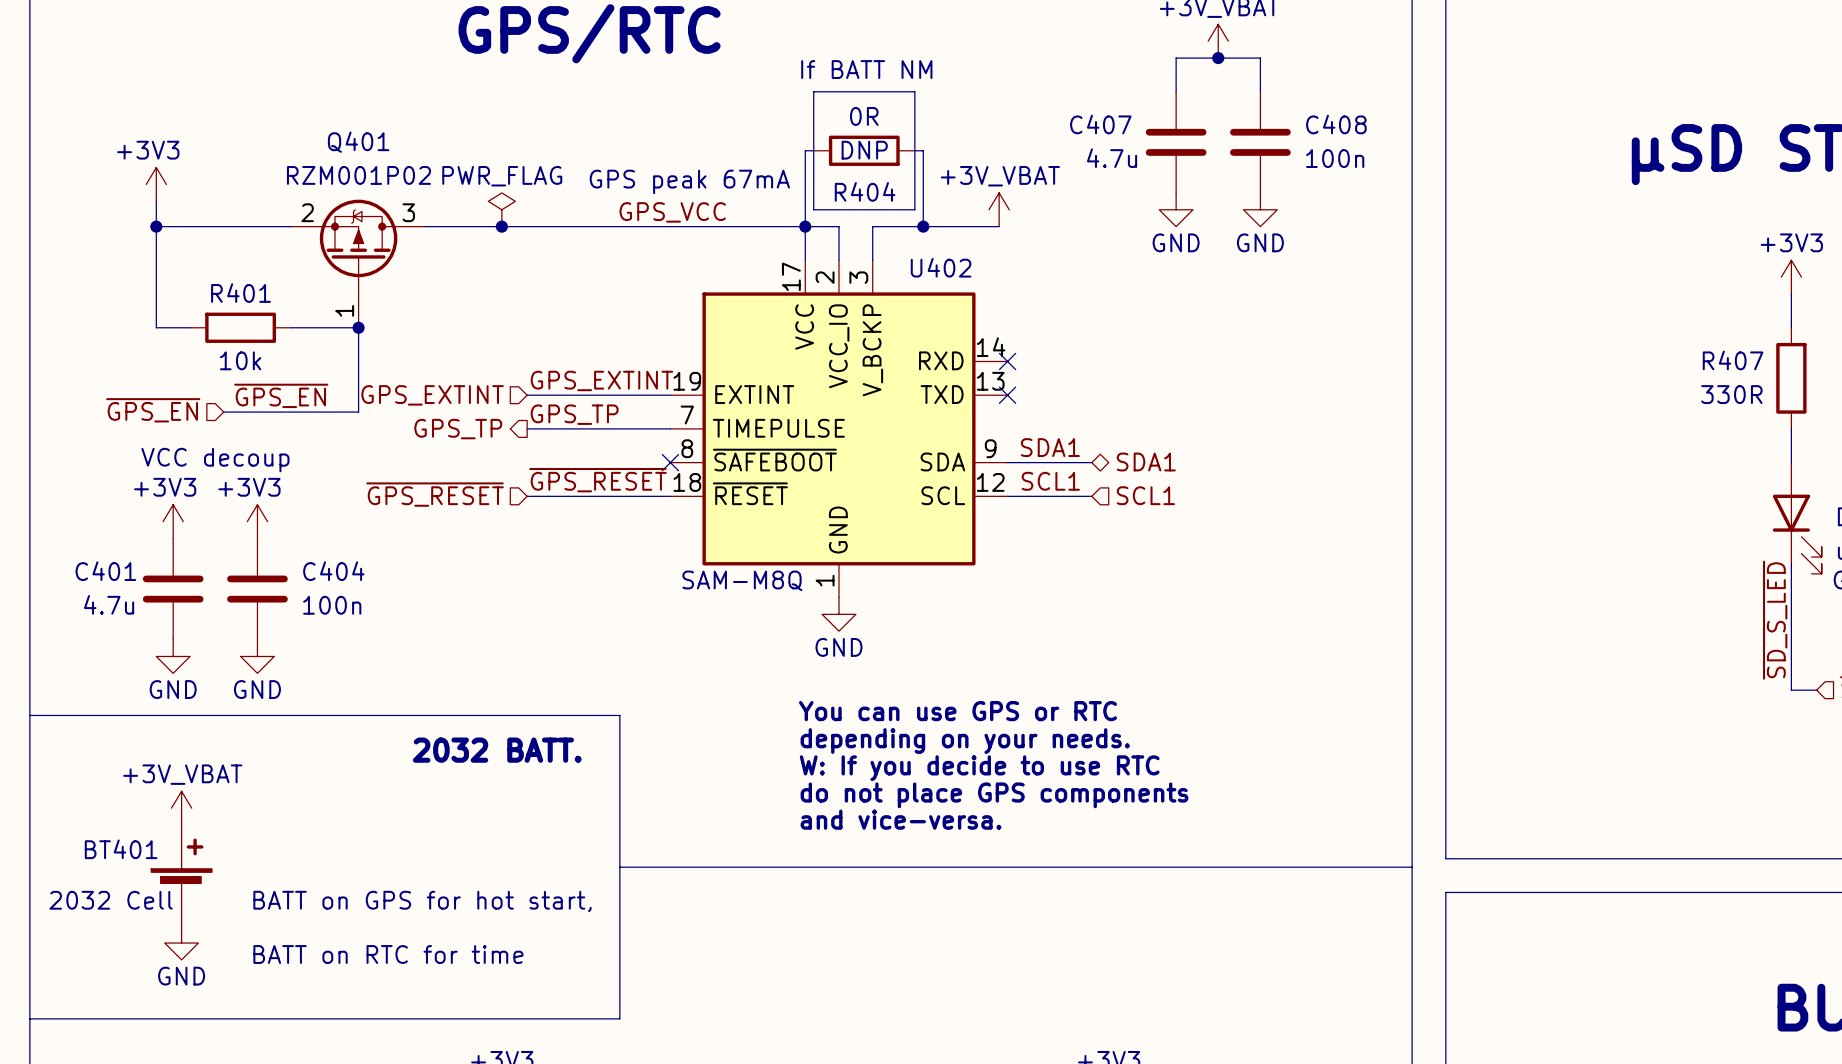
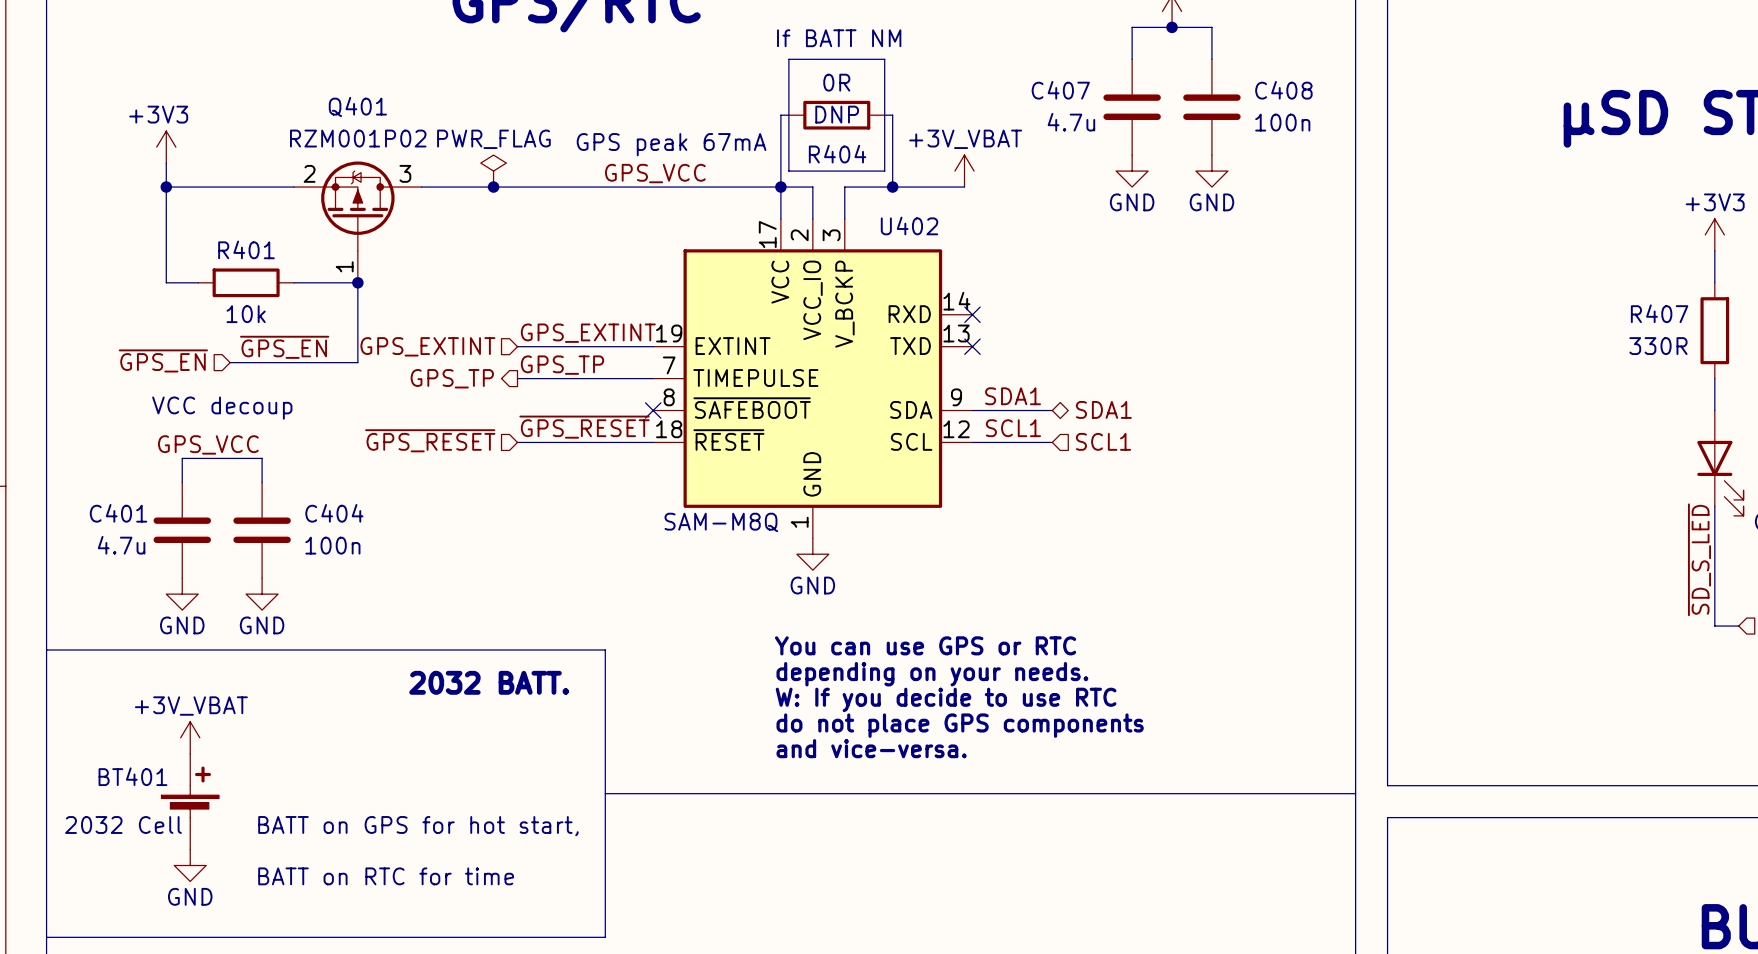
label: none -> GPS_VCC (208, 444)
power symbol: +3V3 (173, 521) -> none
power symbol: +3V3 (257, 521) -> none
wire: none -> (182, 482) (182, 458) (262, 458) (262, 482)

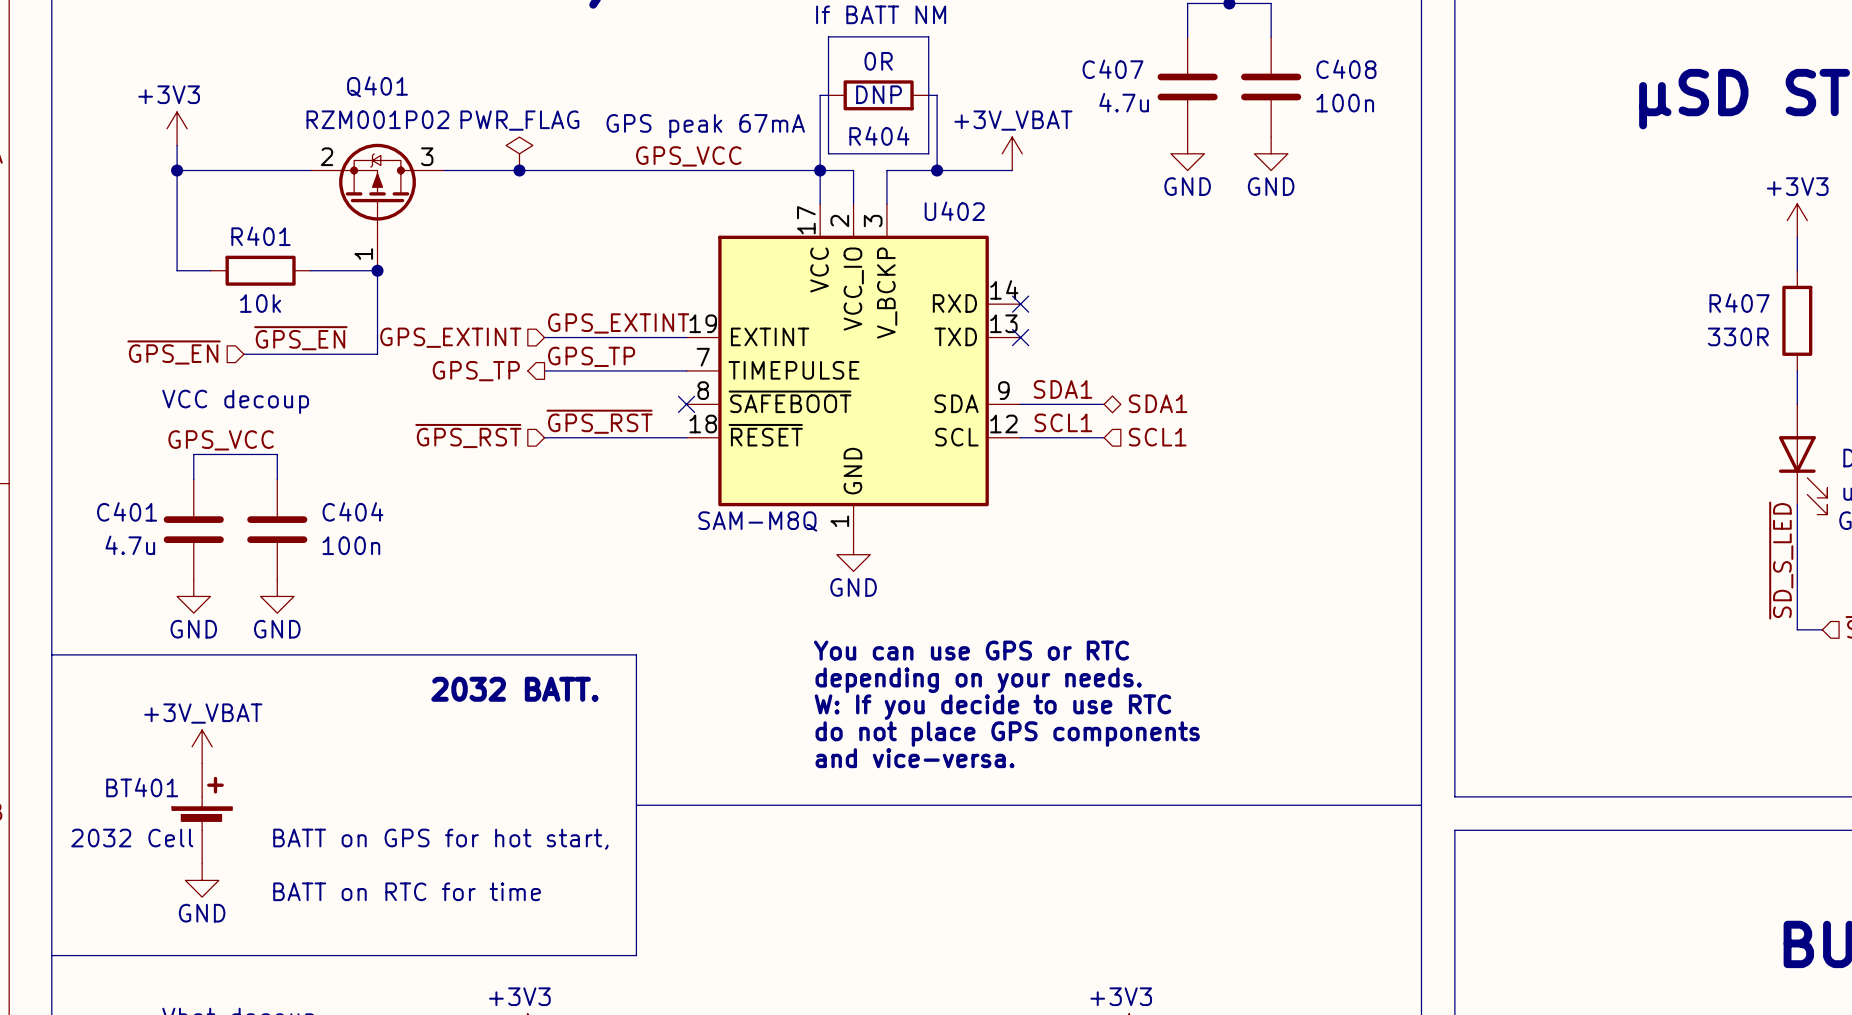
label: ~{GPS_RESET} (584, 427) -> ~{GPS_RST} (599, 421)
hierarchical label: ~{GPS_RESET} (430, 440) -> ~{GPS_RST} (468, 436)

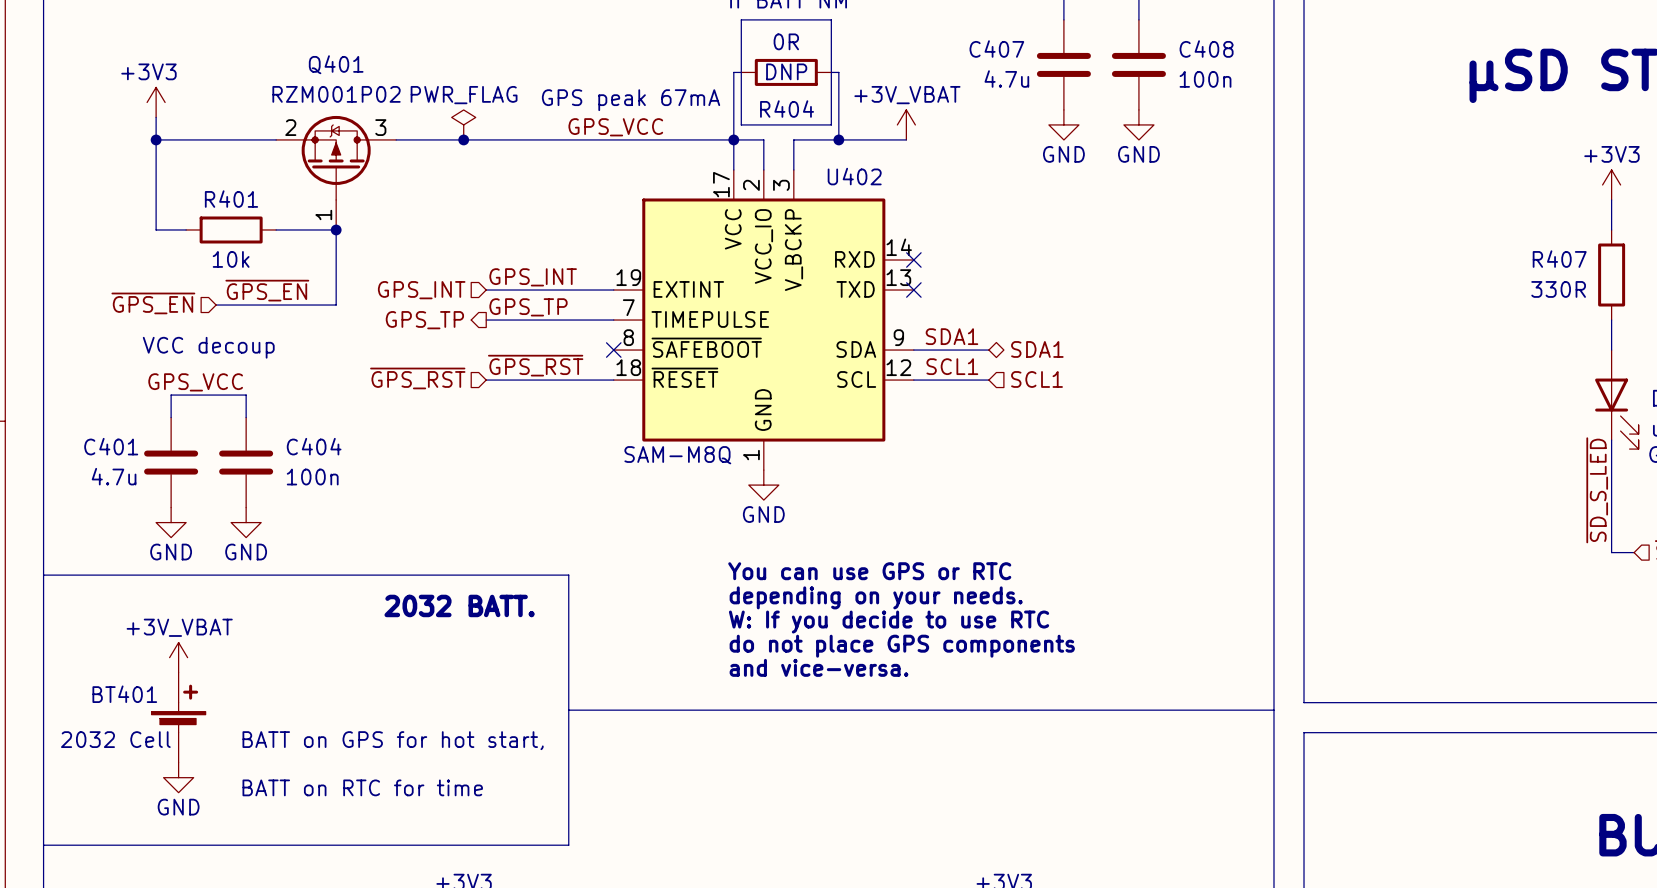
label: GPS_EXTINT (618, 323) -> GPS_INT (533, 277)
hierarchical label: GPS_EXTINT (450, 337) -> GPS_INT (421, 290)

